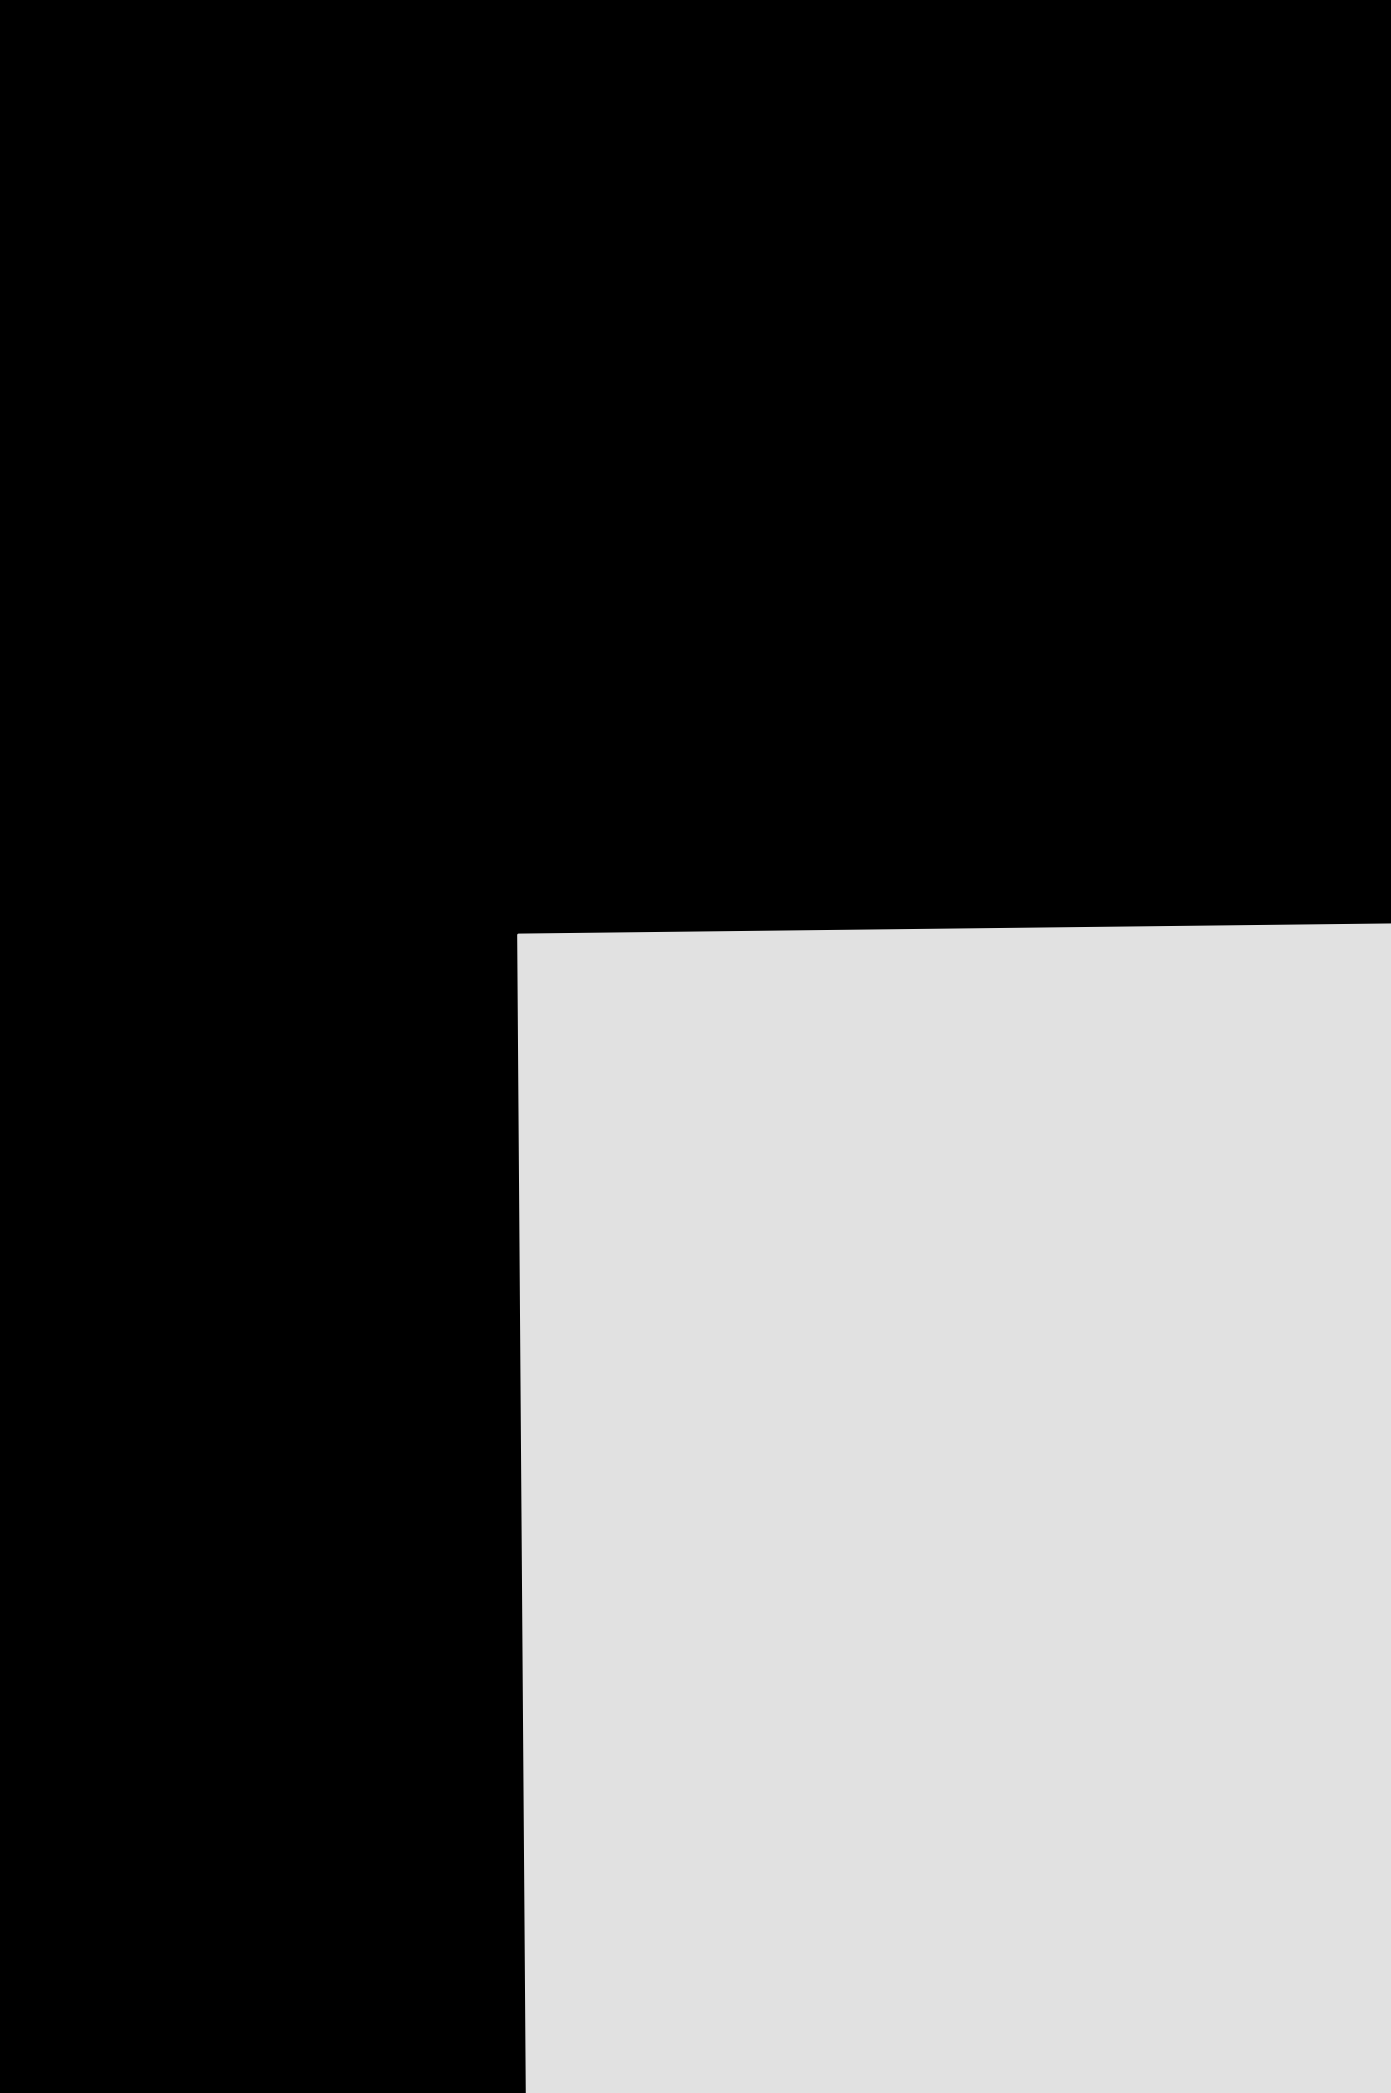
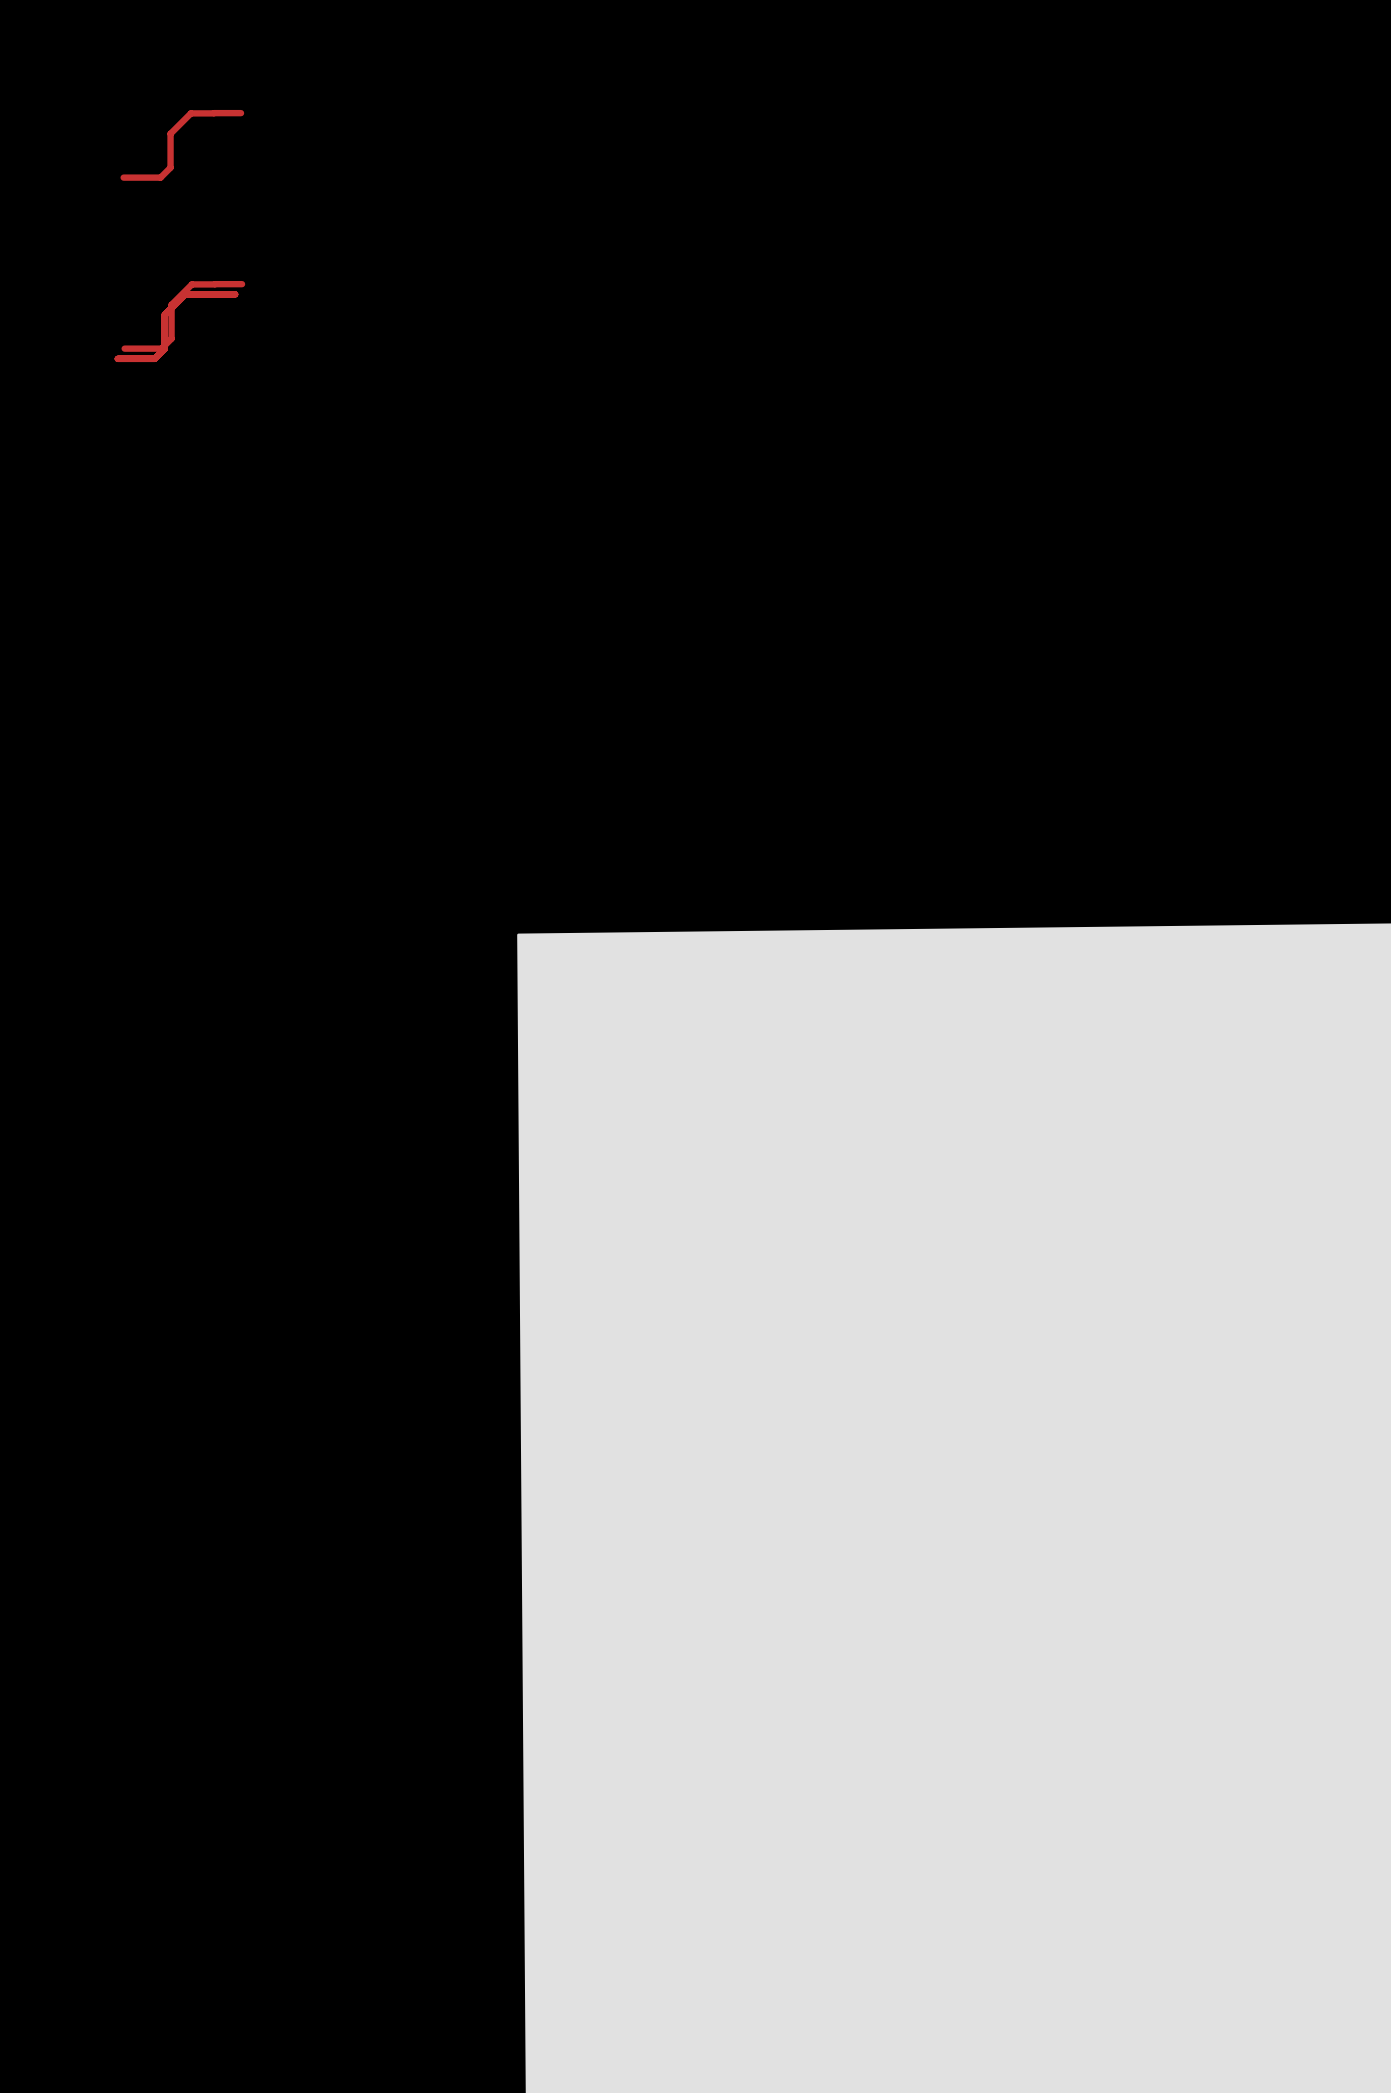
track: none -> (213, 113) (241, 113)
track: none -> (213, 113) (190, 113) (170, 133) (170, 167) (160, 177) (123, 177)
track: none -> (214, 284) (242, 284)
track: none -> (214, 284) (191, 284) (171, 304) (171, 338) (161, 348) (124, 348)
track: none -> (207, 294) (185, 294) (164, 315) (164, 348) (154, 358) (117, 358)
track: none -> (208, 294) (235, 294)

